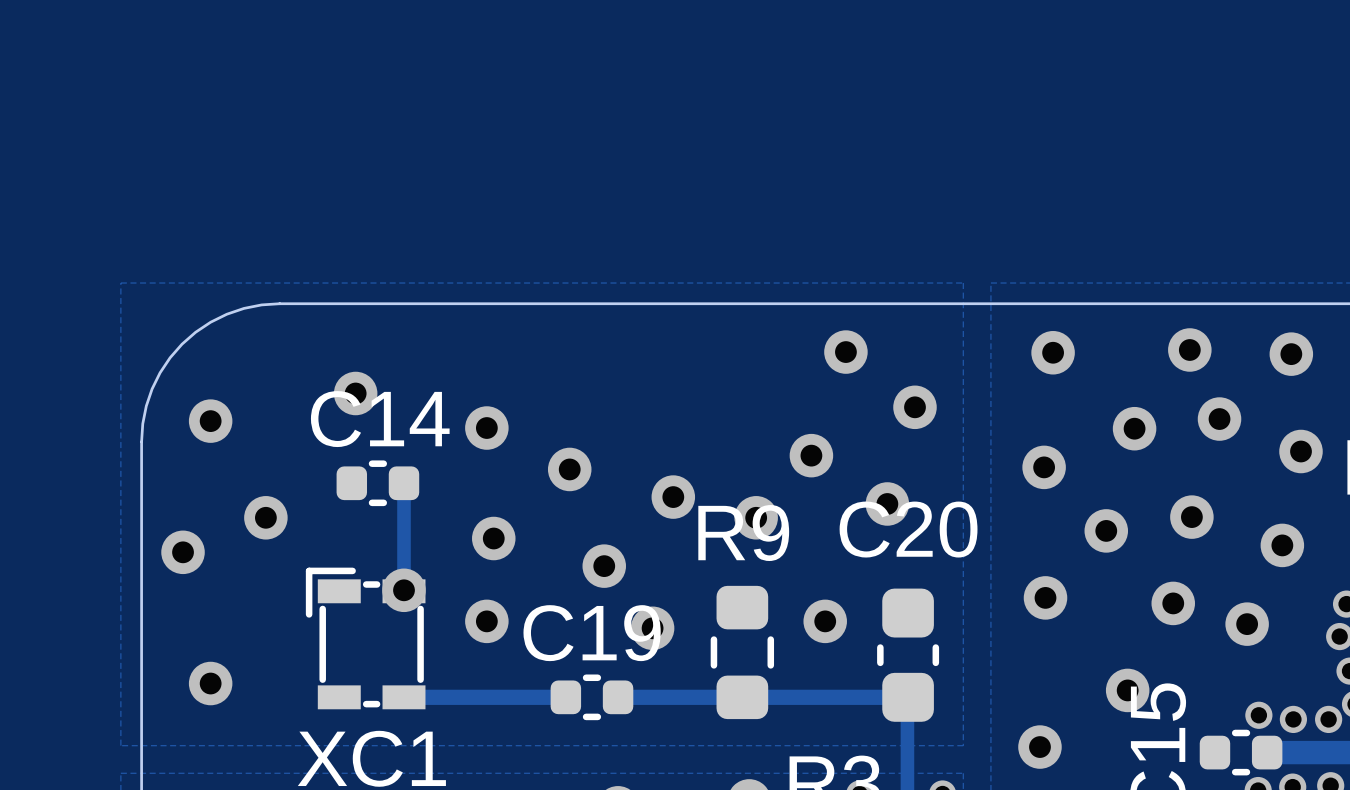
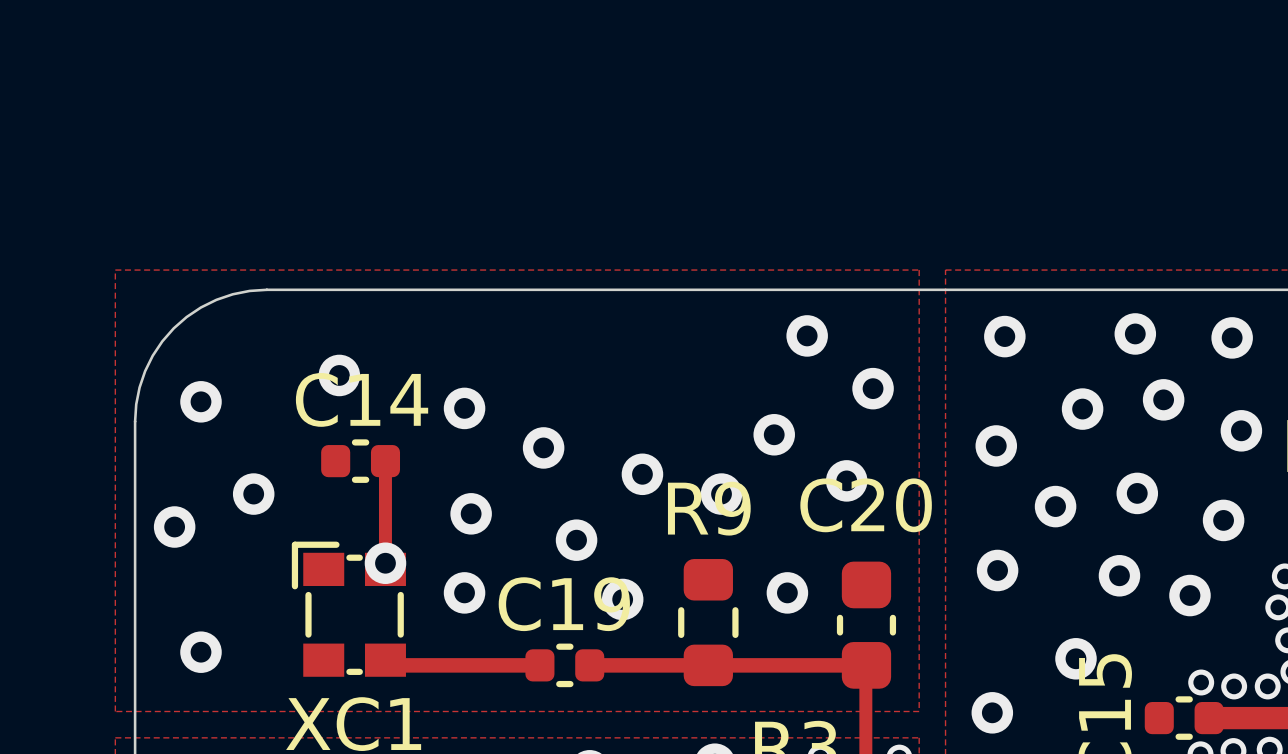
XC1 footprint: [305, 567, 426, 710] -> [291, 541, 406, 677]

